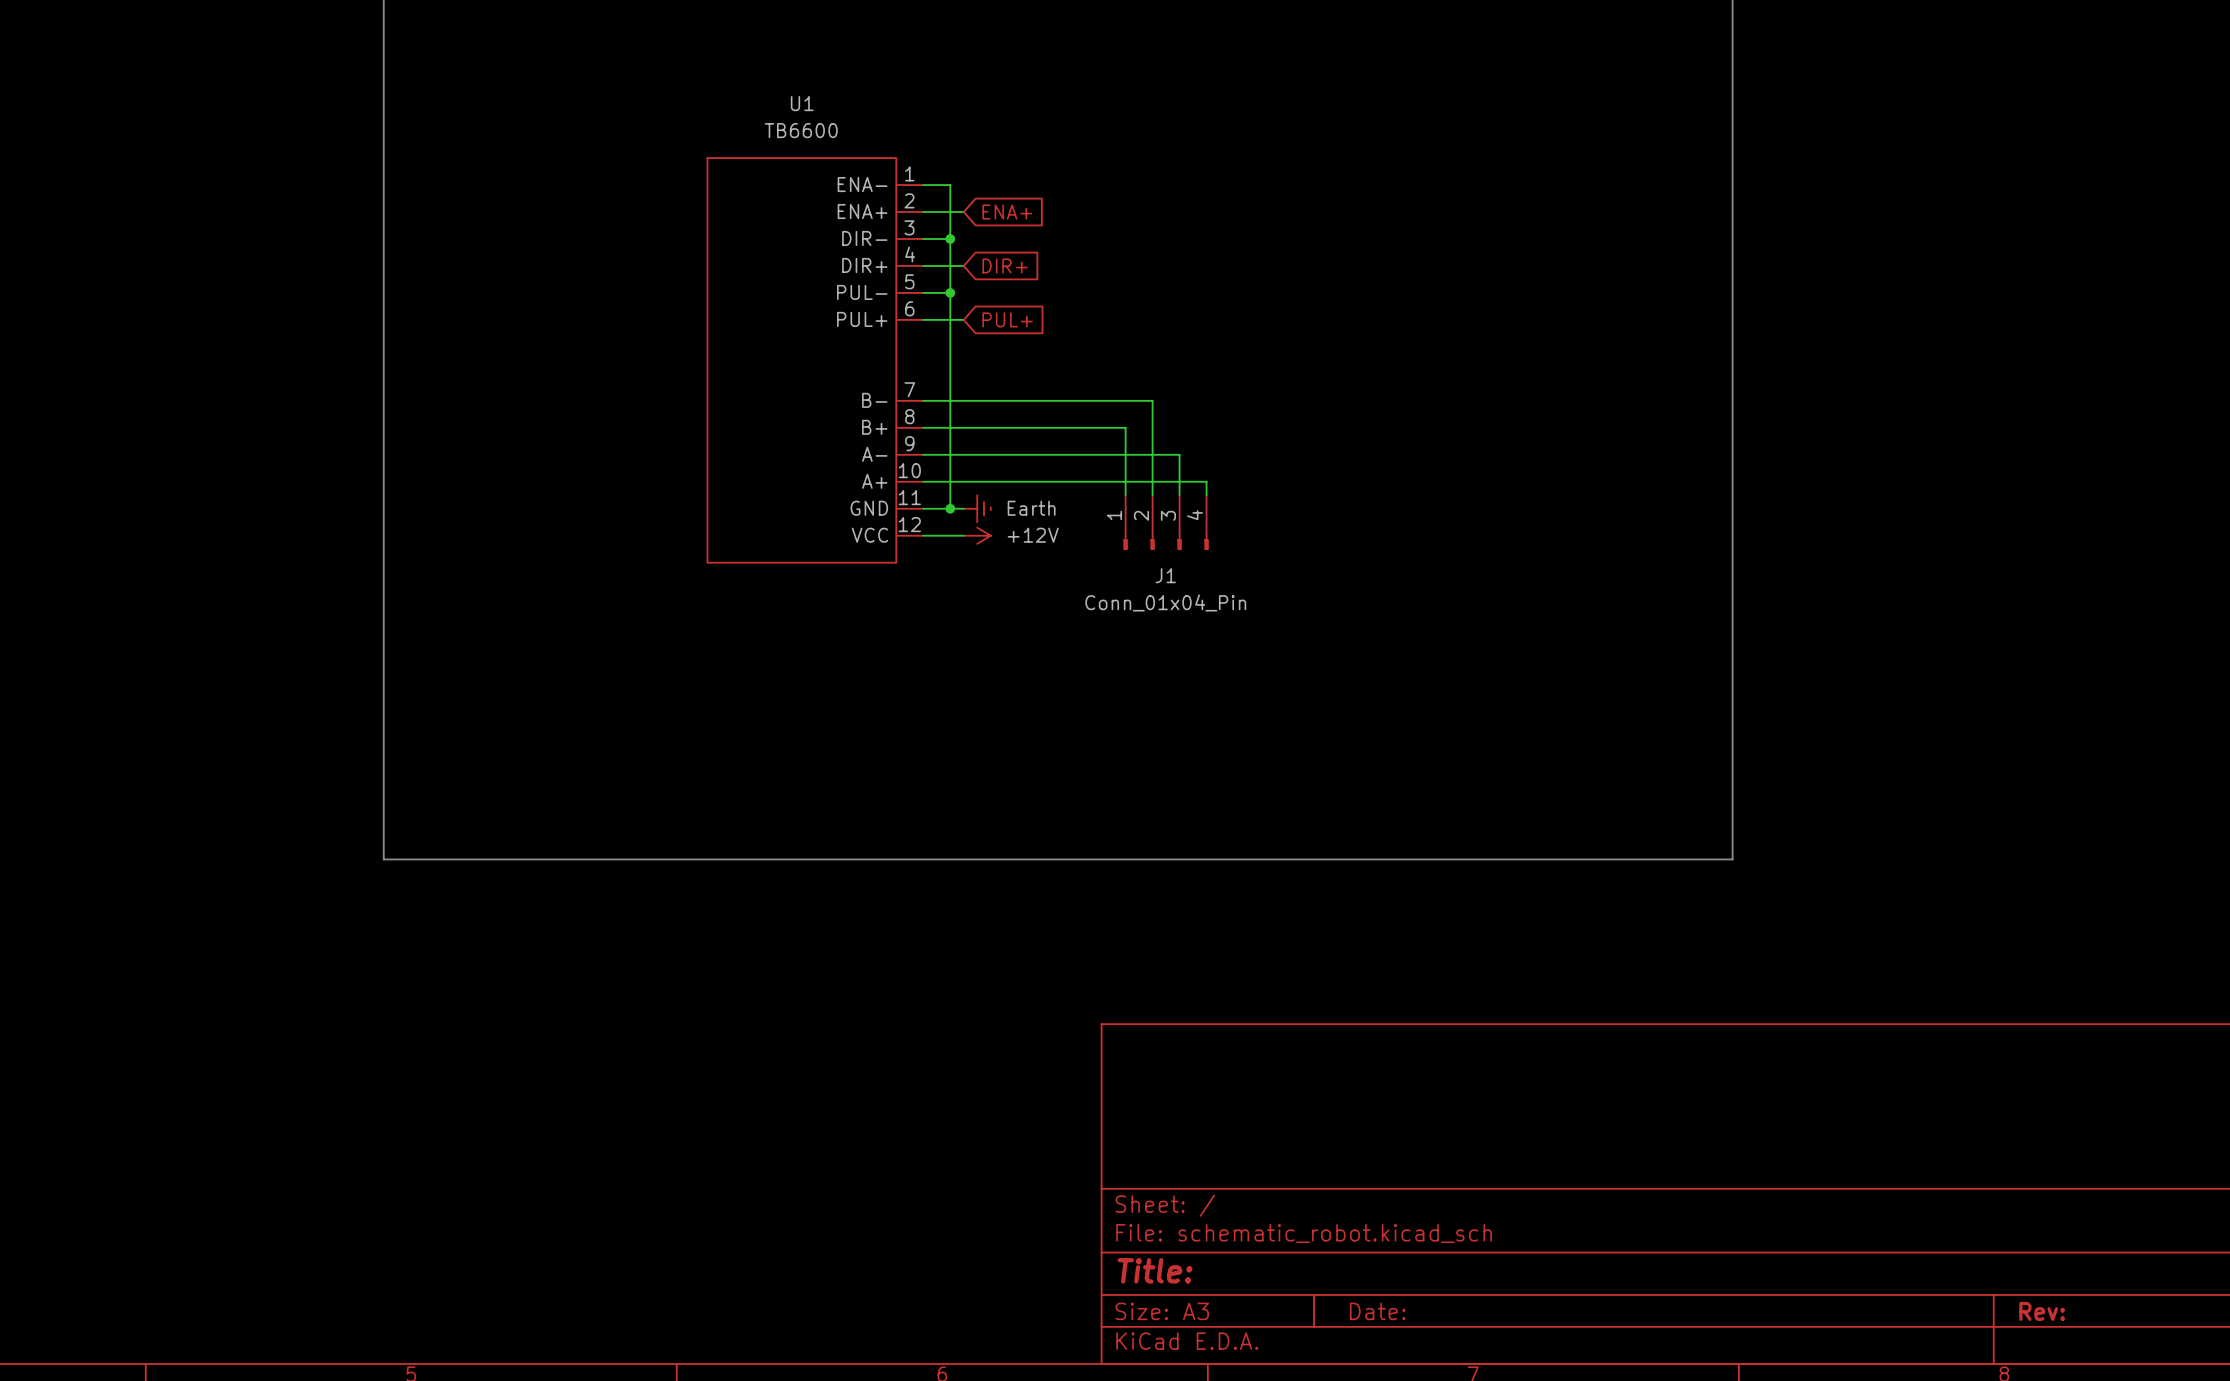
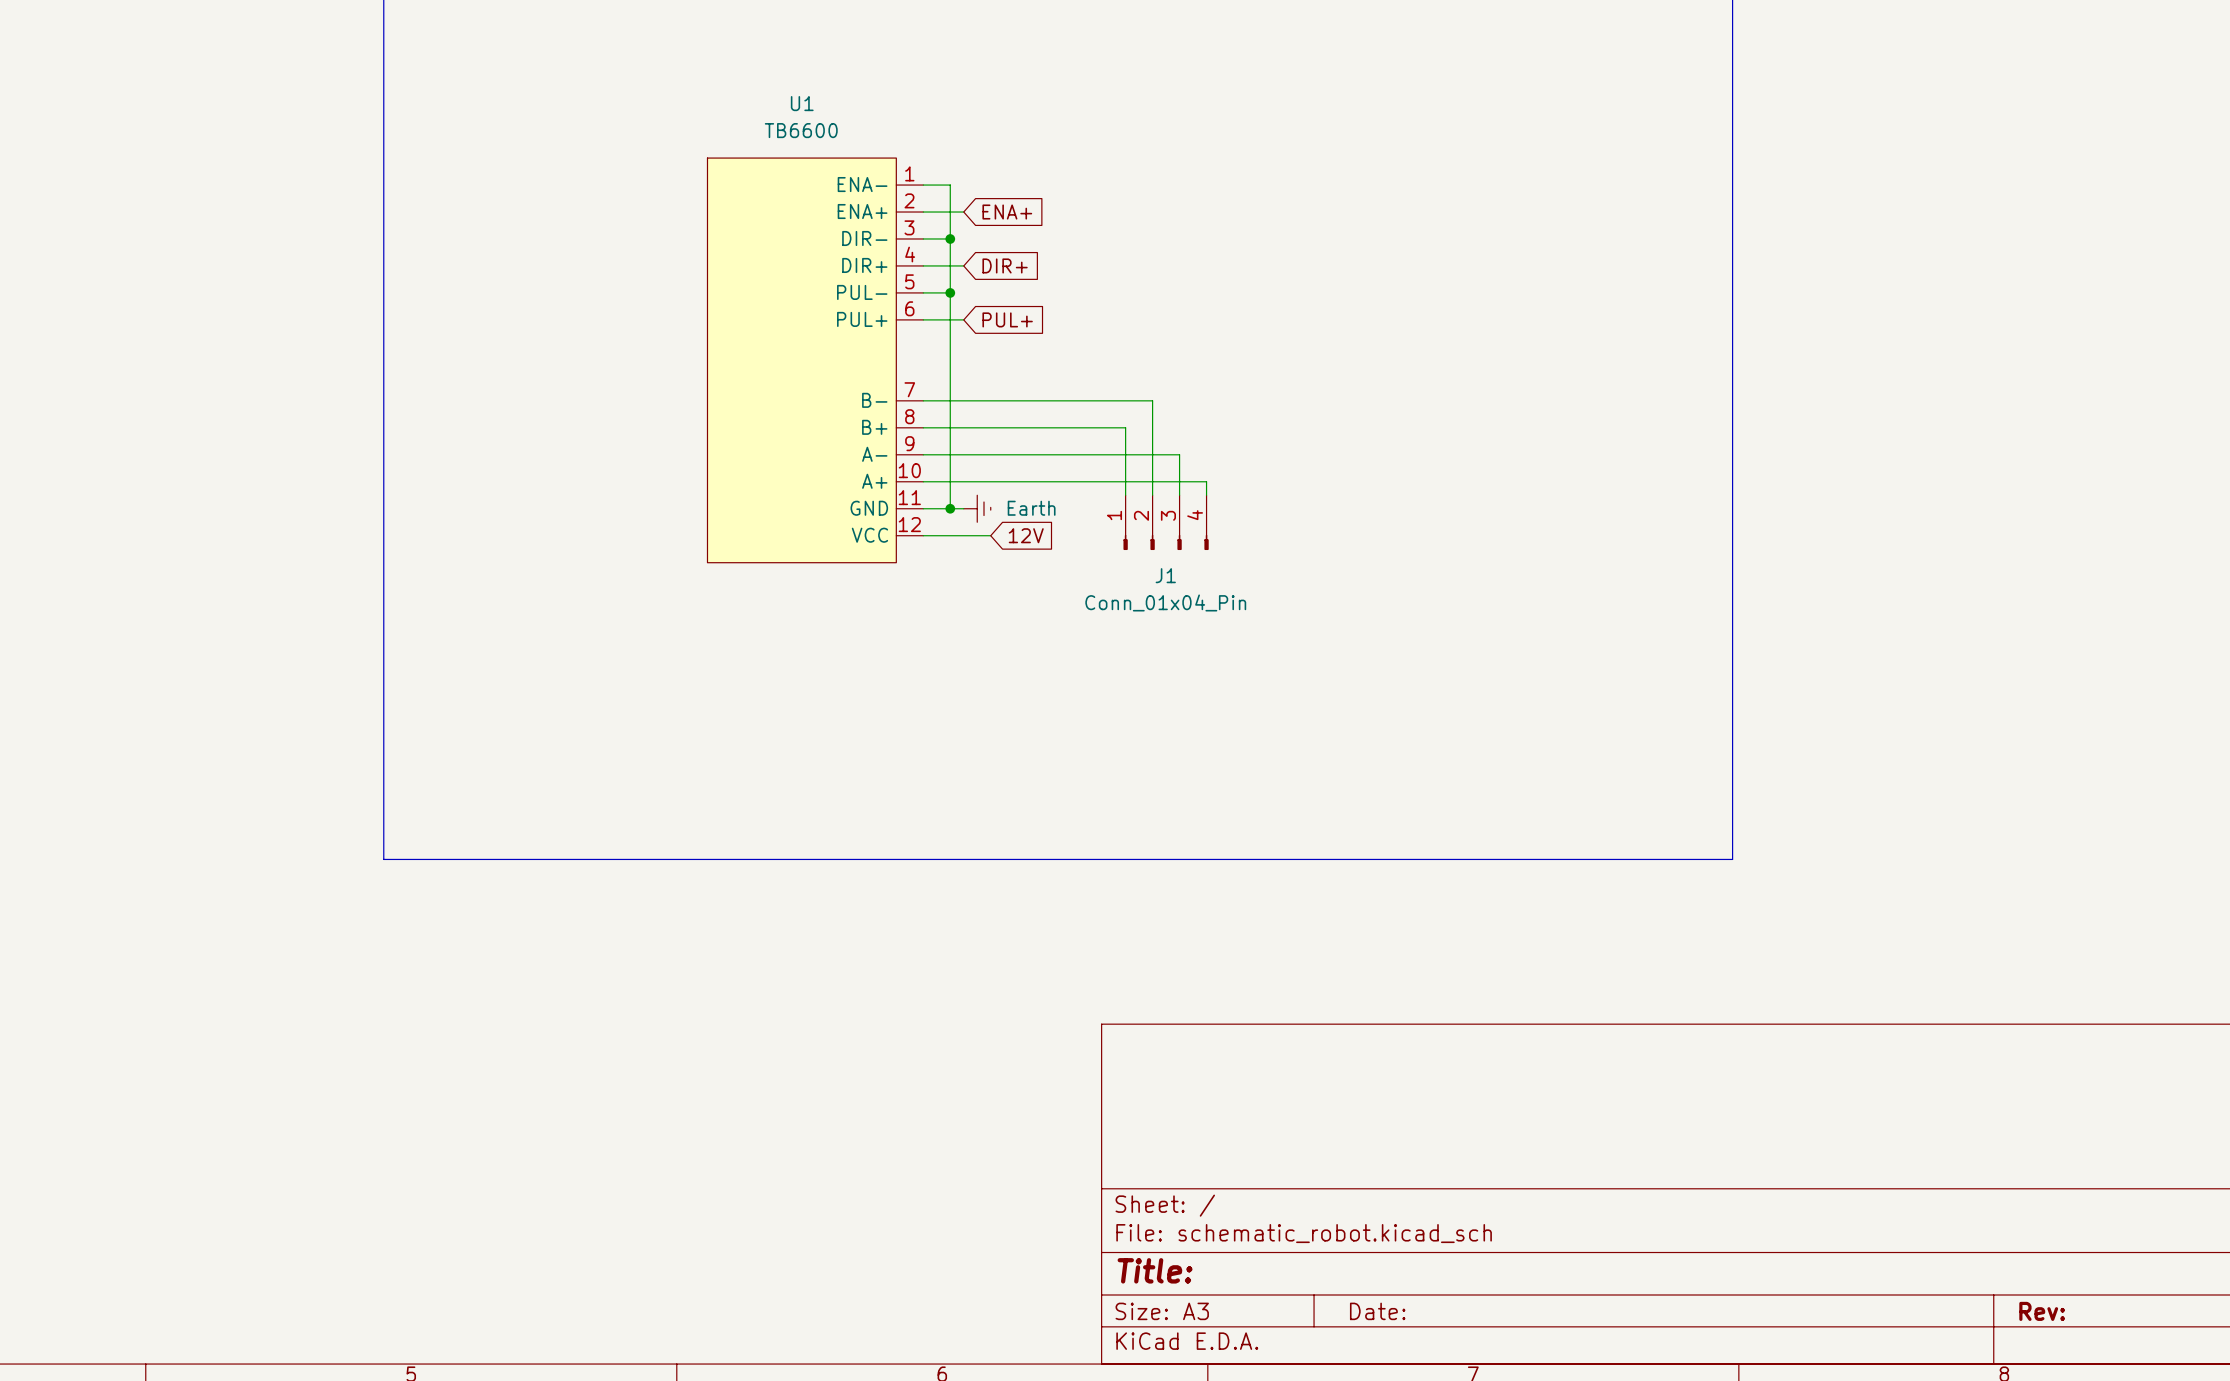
power symbol: +12V (977, 535) -> none
global label: none -> 12V (1026, 535)

